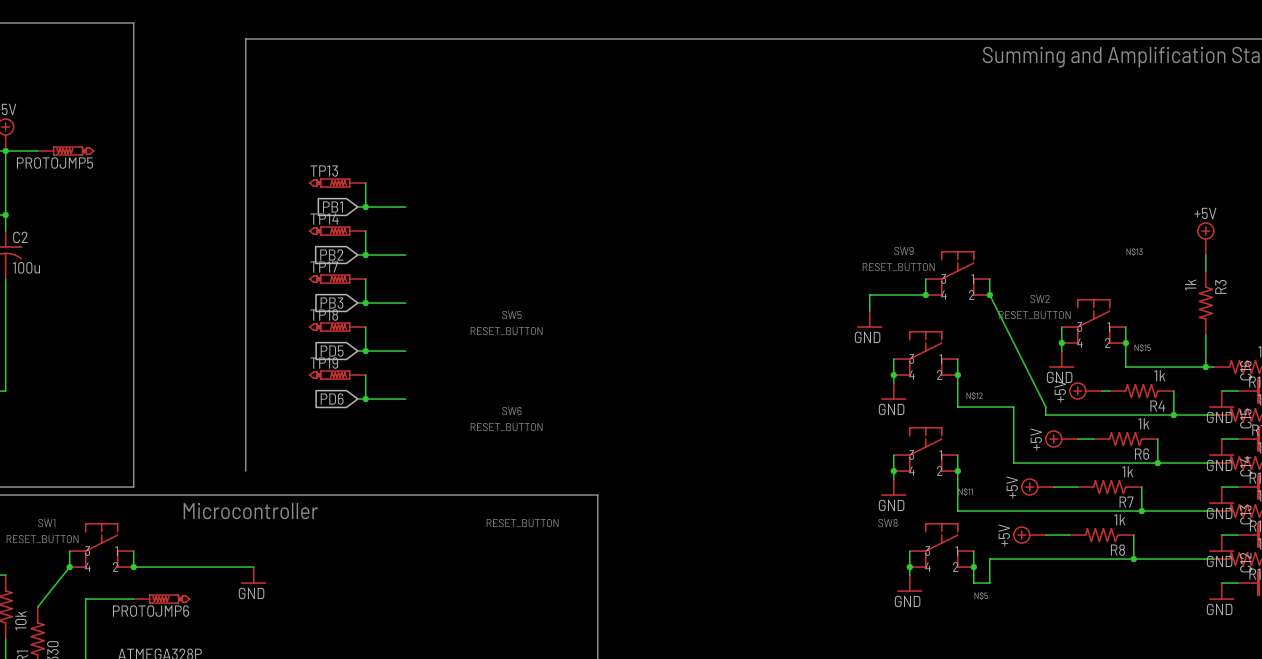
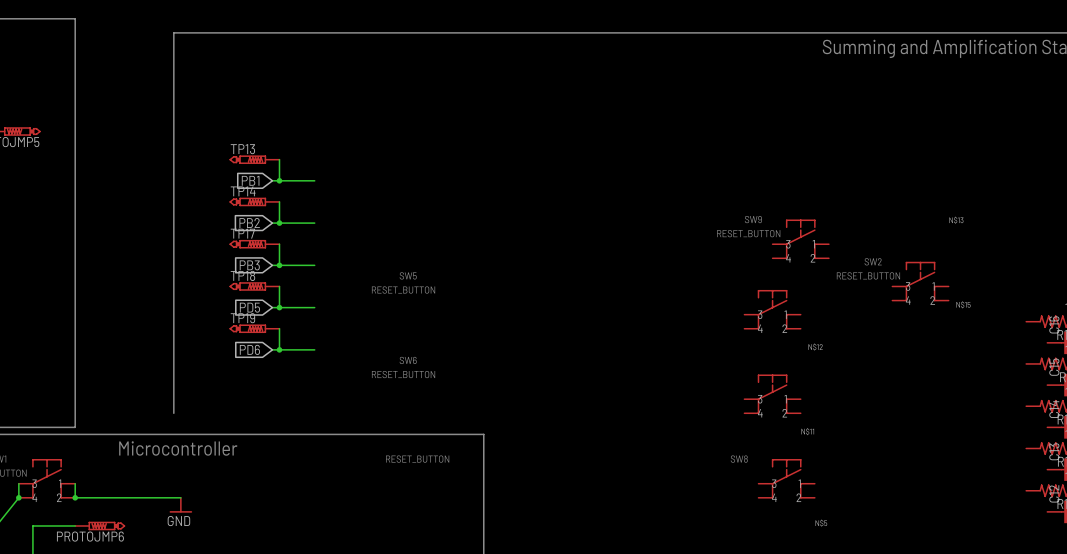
power symbol: +5V (1205, 238) -> none
wire: (1205, 255) (1205, 271) -> none
wire: (925, 279) (925, 295) (869, 295) (869, 311) -> none
wire: (989, 279) (989, 295) (1045, 407) (1045, 415) (1213, 415) -> none
junction: (925, 295) -> none
junction: (989, 295) -> none
R3: 1k (1205, 303) -> none
power symbol: GND (869, 319) -> none
wire: (1061, 327) (1061, 351) -> none
wire: (1125, 327) (1125, 367) (1213, 367) -> none
wire: (1205, 335) (1205, 367) -> none
junction: (1061, 343) -> none
junction: (1125, 343) -> none
wire: (893, 359) (893, 383) -> none
wire: (957, 359) (957, 407) (1013, 407) (1013, 463) (1213, 463) -> none
power symbol: GND (1061, 359) -> none
junction: (1205, 367) -> none
junction: (893, 375) -> none
junction: (957, 375) -> none
power symbol: GND (893, 391) -> none
power symbol: +5V (1085, 391) -> none
wire: (1101, 391) (1109, 391) -> none
R4: 1k (1141, 391) -> none
wire: (1173, 391) (1173, 415) -> none
wire: (1221, 391) (1237, 391) -> none
power symbol: GND (1221, 399) -> none
junction: (1173, 415) -> none
power symbol: +5V (1061, 439) -> none
wire: (1077, 439) (1093, 439) -> none
R6: 1k (1125, 439) -> none
wire: (1157, 439) (1157, 463) -> none
wire: (1221, 439) (1237, 439) -> none
power symbol: GND (1221, 447) -> none
wire: (893, 455) (893, 479) -> none
wire: (957, 455) (957, 511) (1213, 511) -> none
junction: (1157, 463) -> none
junction: (893, 471) -> none
junction: (957, 471) -> none
power symbol: GND (893, 487) -> none
power symbol: +5V (1037, 487) -> none
wire: (1053, 487) (1077, 487) -> none
R7: 1k (1109, 487) -> none
wire: (1141, 487) (1141, 511) -> none
wire: (1221, 487) (1237, 487) -> none
power symbol: GND (1221, 495) -> none
junction: (1141, 511) -> none
power symbol: +5V (1029, 535) -> none
wire: (1045, 535) (1069, 535) -> none
R8: 1k (1101, 535) -> none
wire: (1133, 535) (1133, 559) -> none
wire: (1221, 535) (1237, 535) -> none
power symbol: GND (1221, 543) -> none
wire: (909, 551) (909, 575) -> none
wire: (973, 551) (973, 583) (989, 583) (989, 559) (1213, 559) -> none
junction: (1133, 559) -> none
junction: (909, 567) -> none
junction: (973, 567) -> none
power symbol: GND (909, 583) -> none
wire: (1221, 583) (1237, 583) -> none
power symbol: GND (1221, 591) -> none

